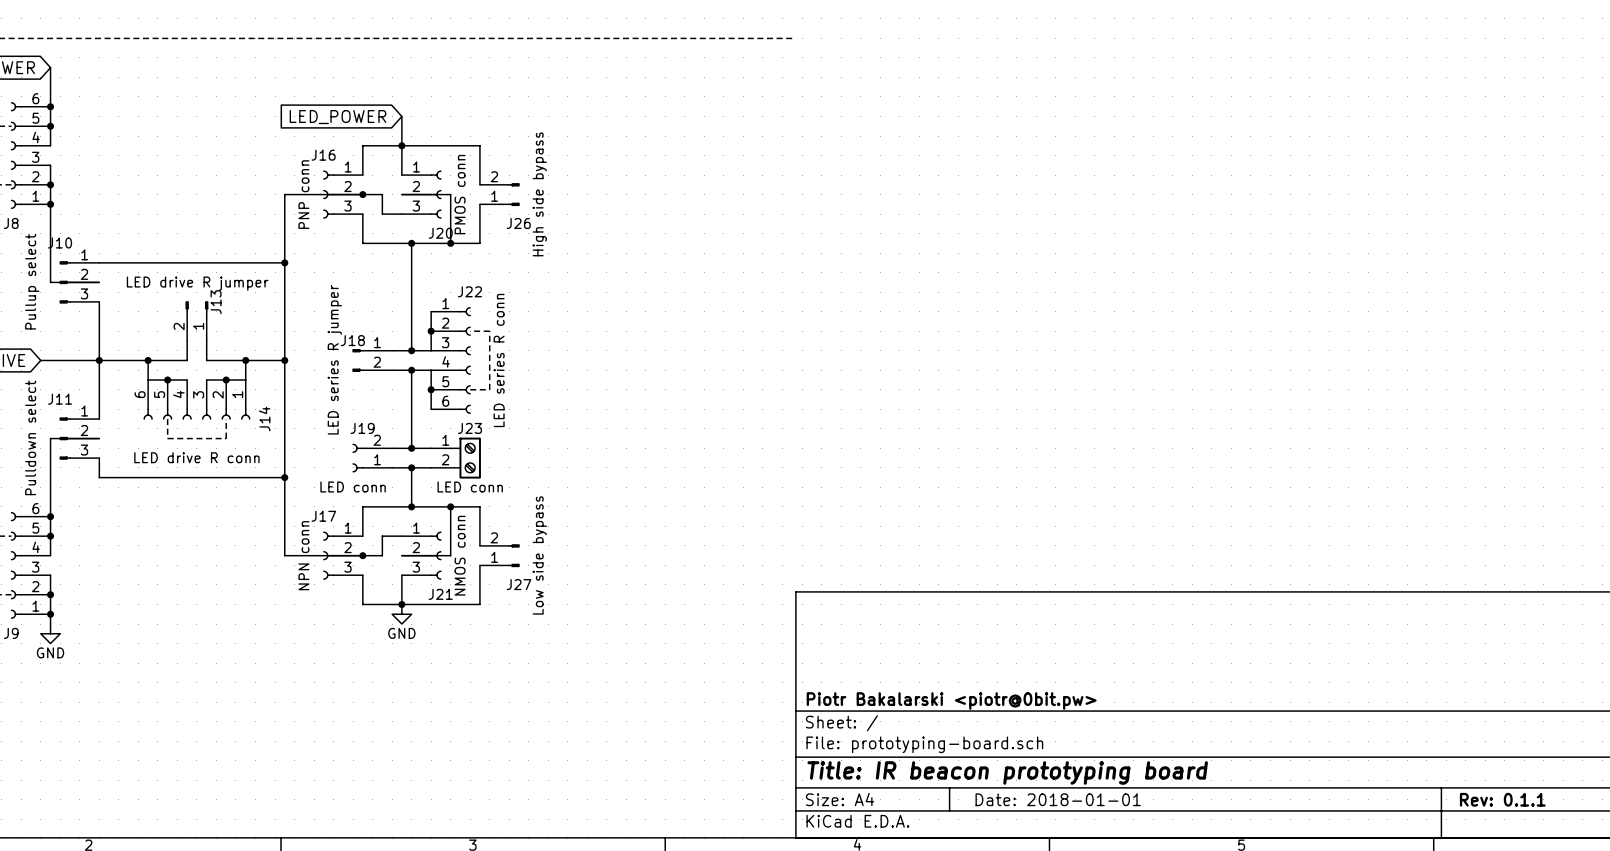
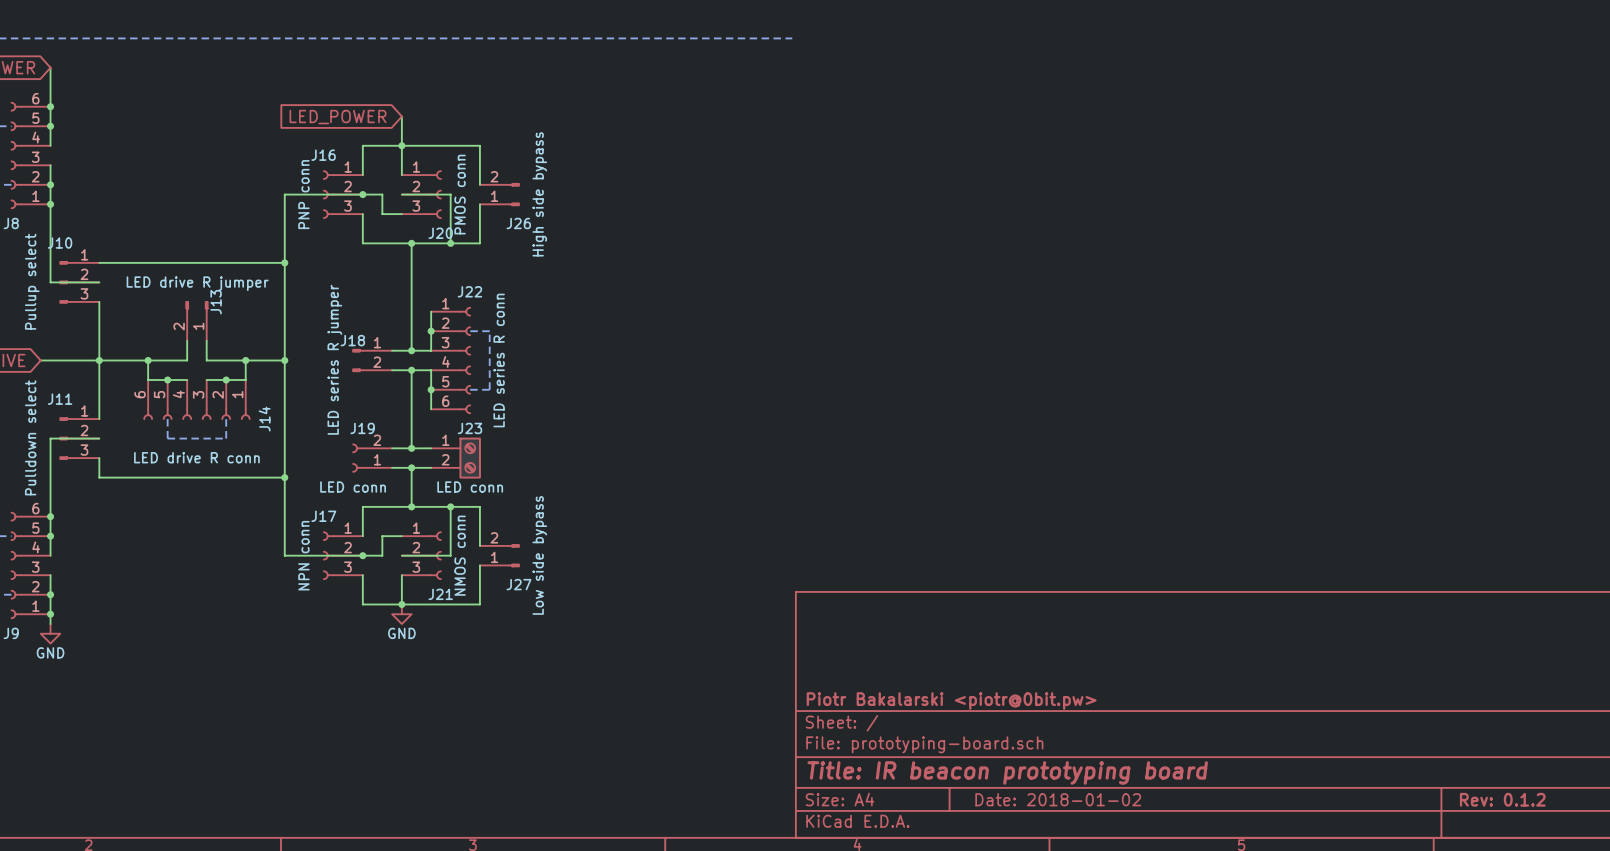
title block: Date: 2018-01-01 (1058, 799) -> Date: 2018-01-02 (1058, 799)
title block: Rev: 0.1.1 (1502, 799) -> Rev: 0.1.2 (1502, 799)

